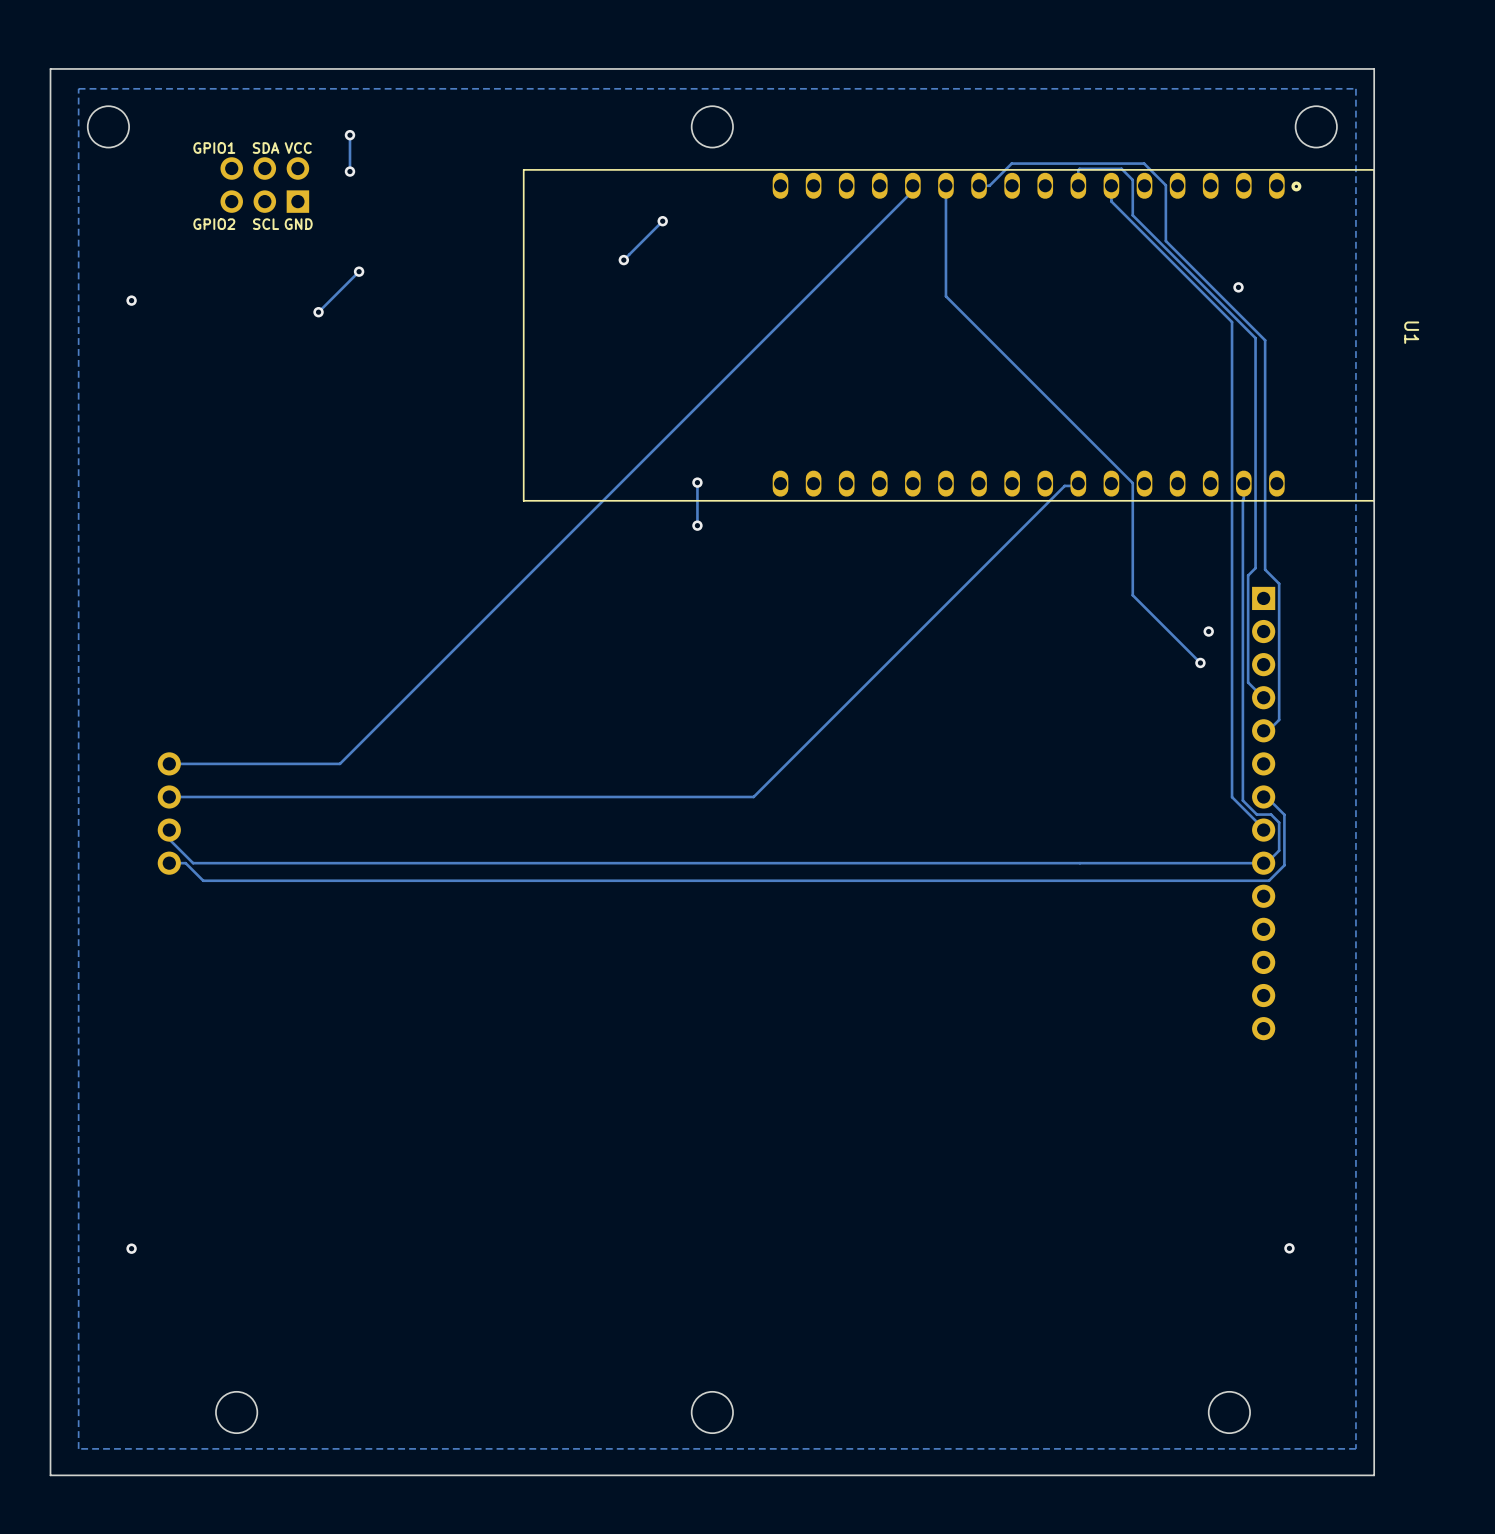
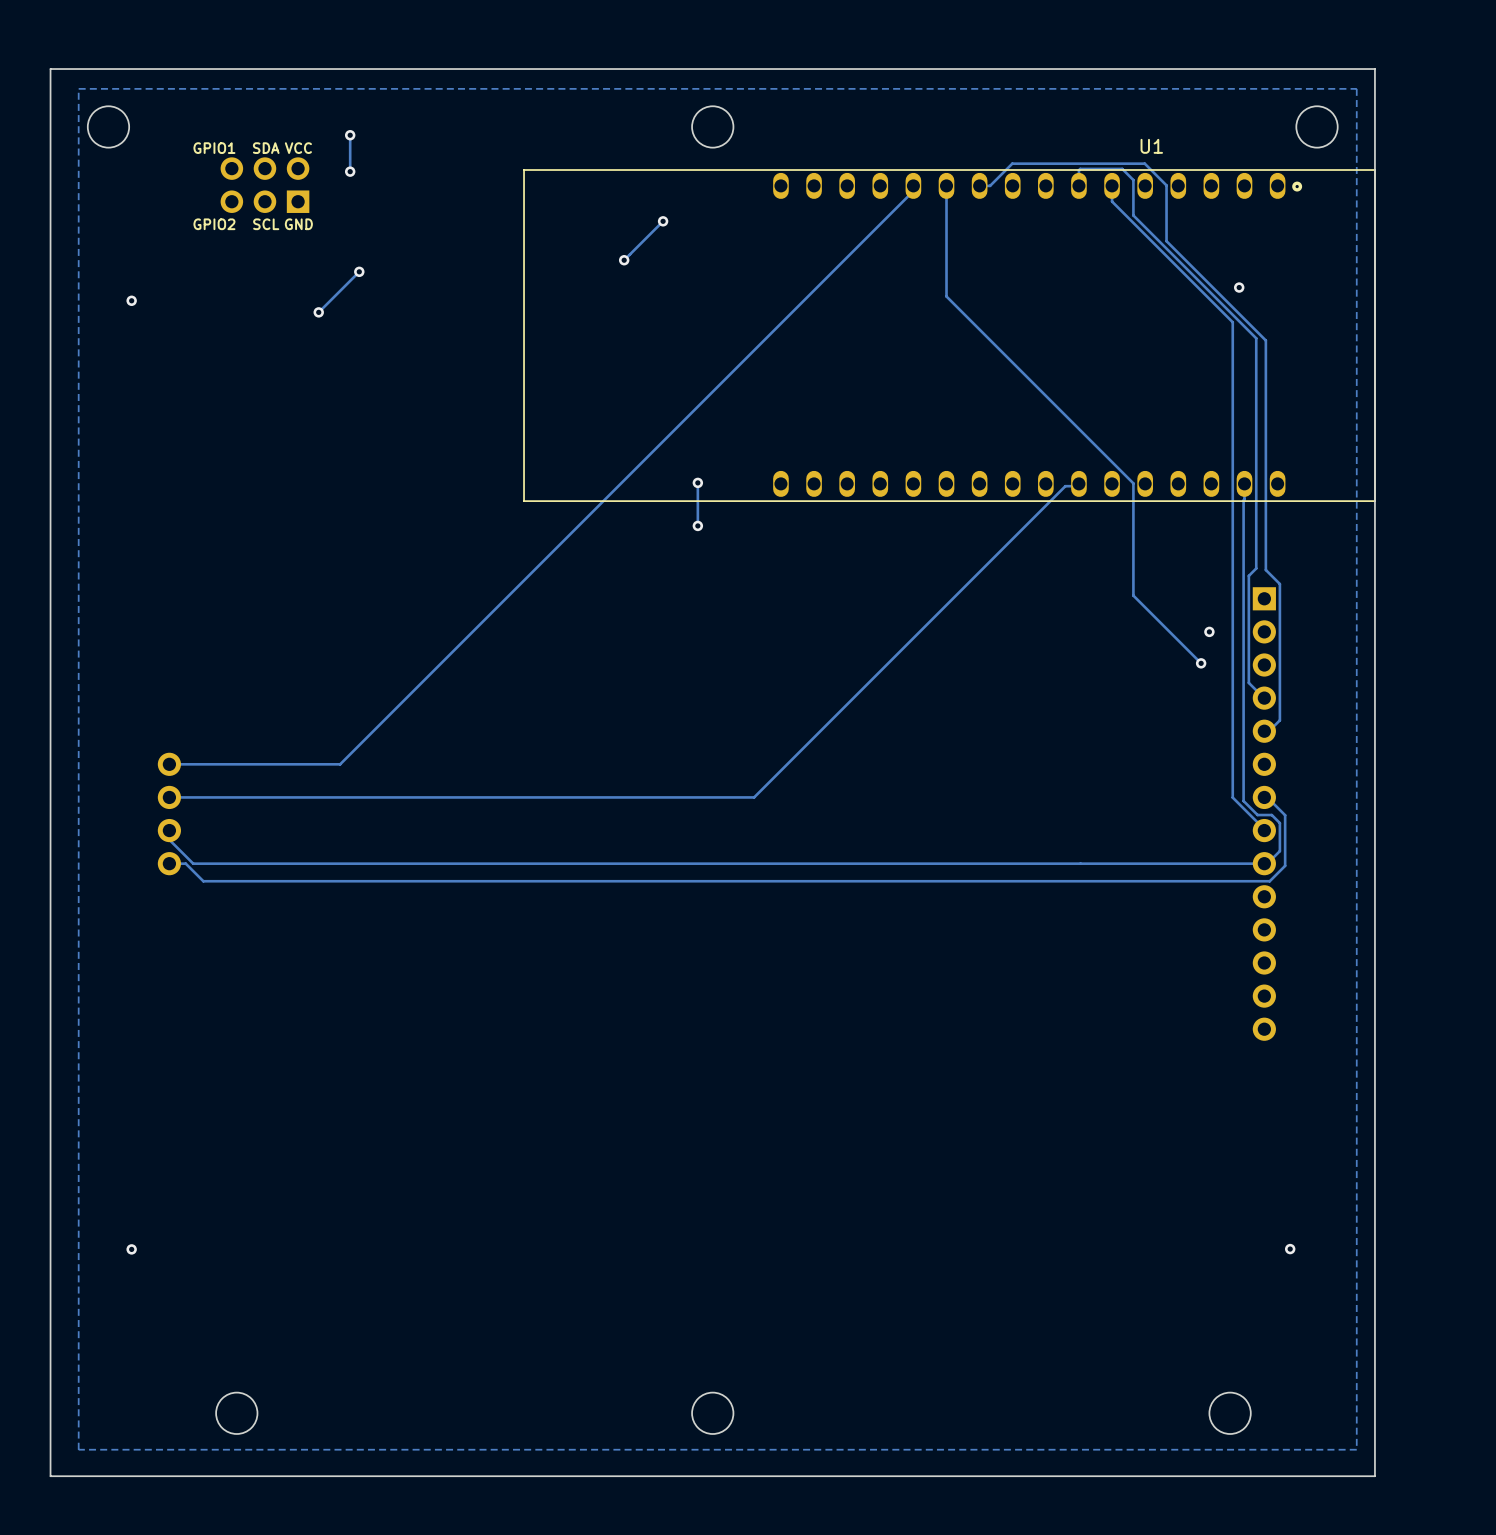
U1 name rotation: 0° (1411, 332) -> 90° counterclockwise (1151, 146)
U1 name position: U1 (1411, 332) -> U1 (1151, 146)

